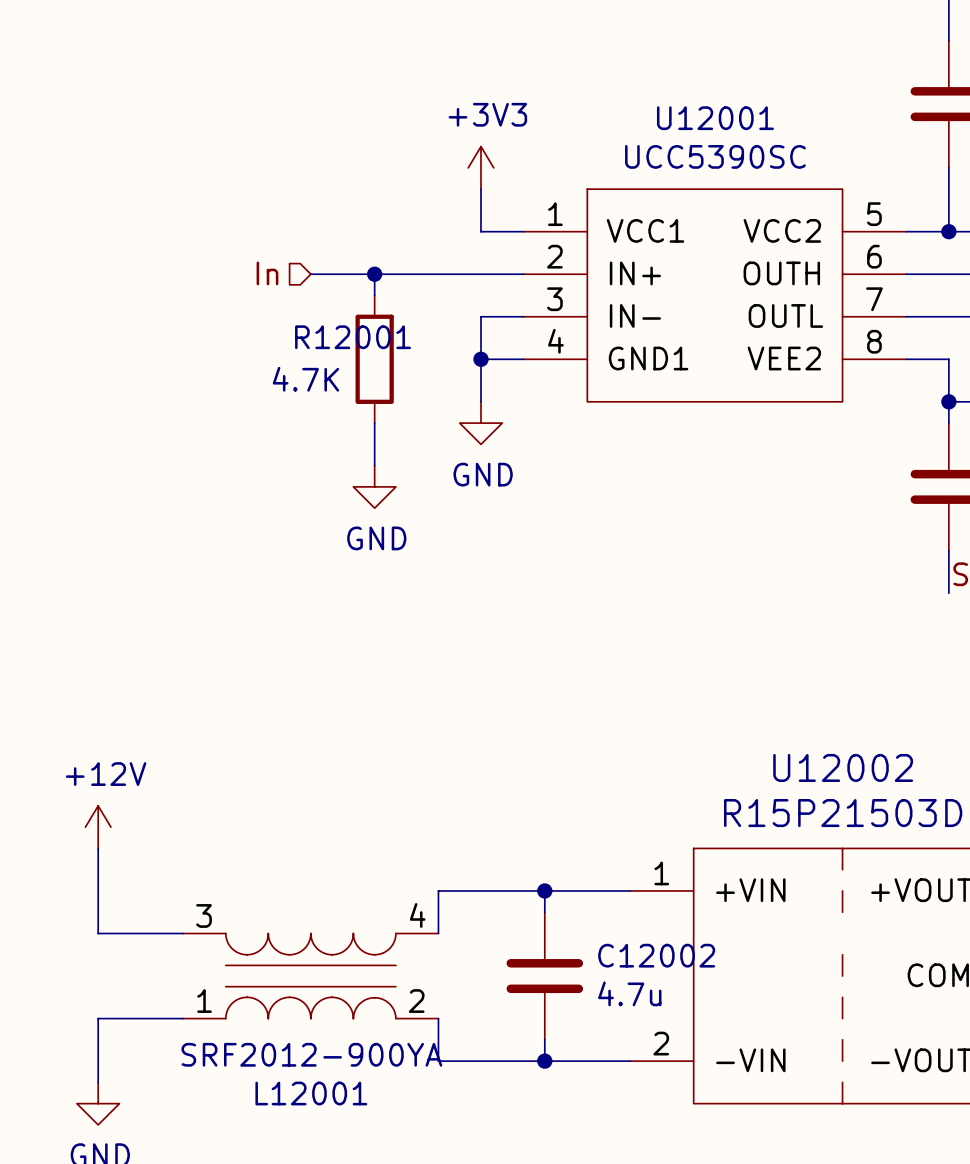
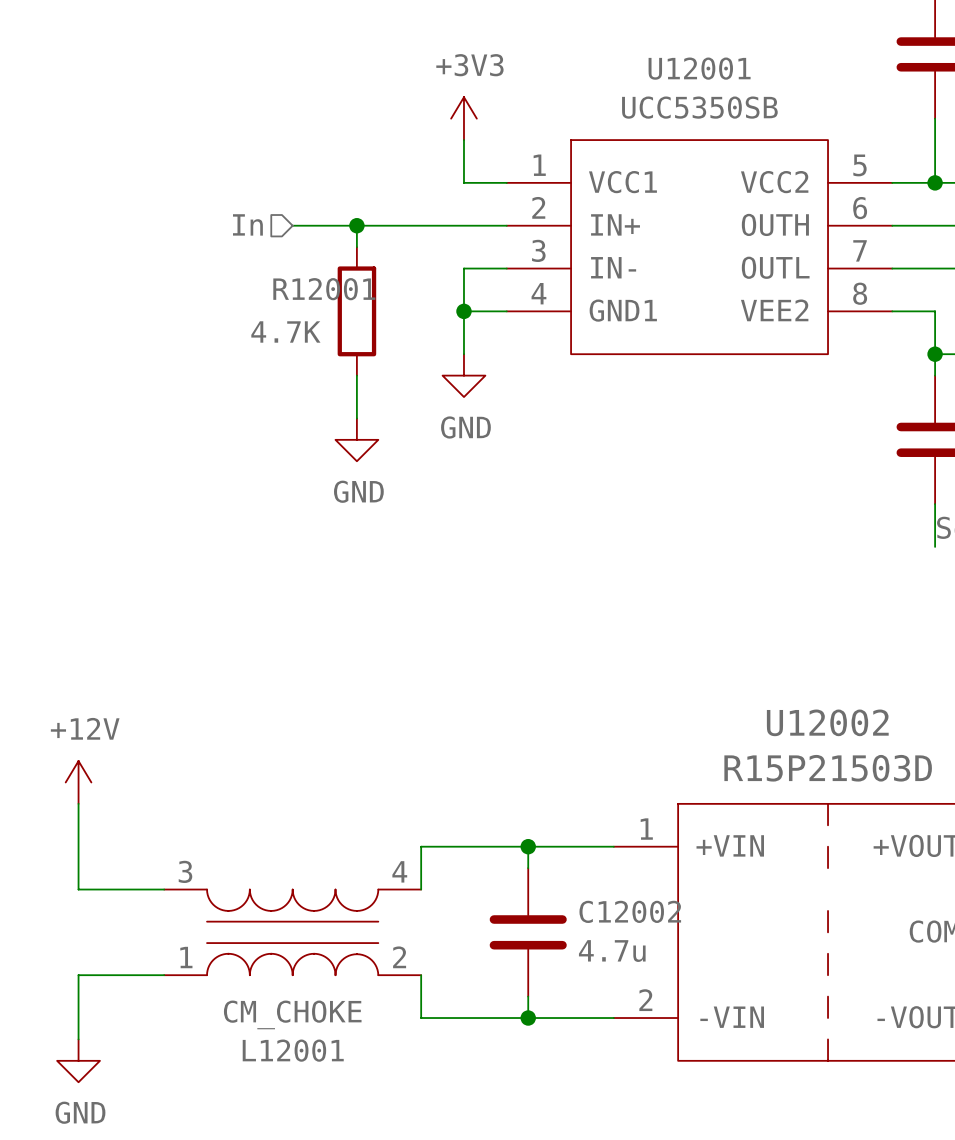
U12001 value: UCC5390SC (715, 156) -> UCC5350SB (699, 107)
L12001 value: SRF2012-900YA (311, 1054) -> CM_CHOKE (292, 1014)

